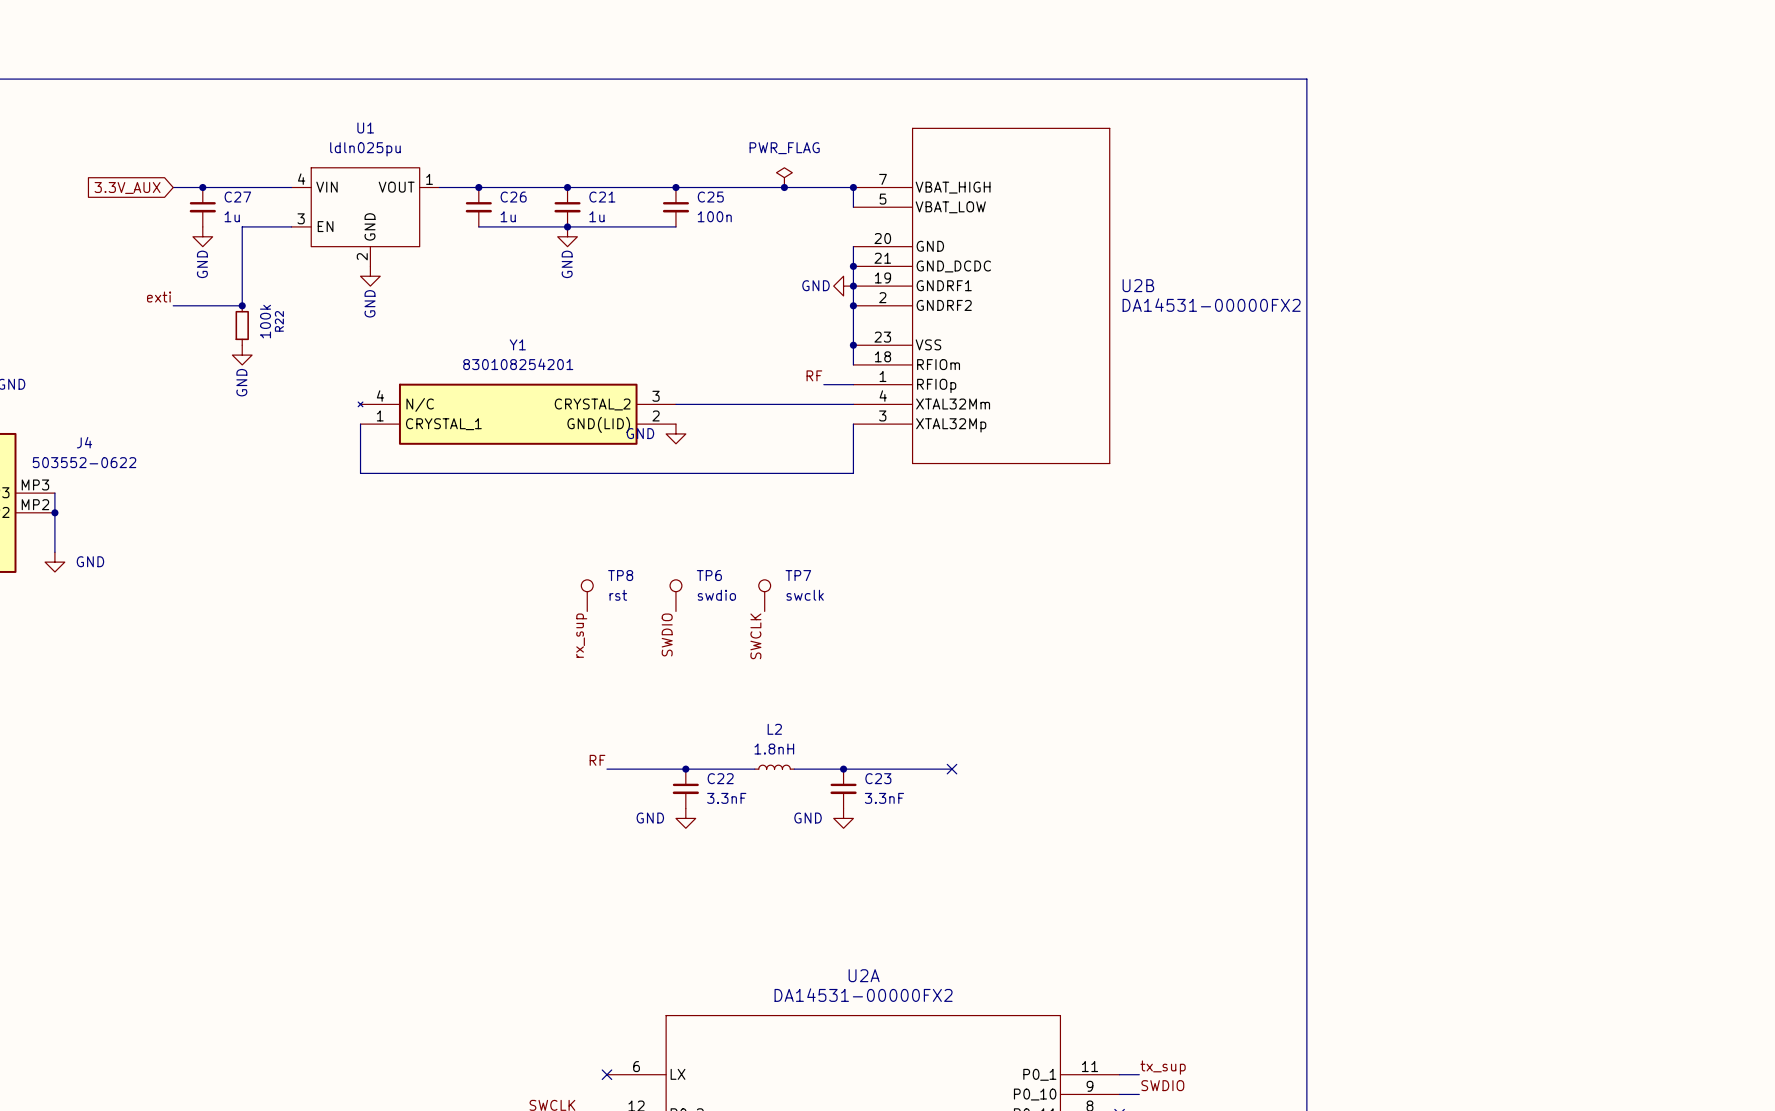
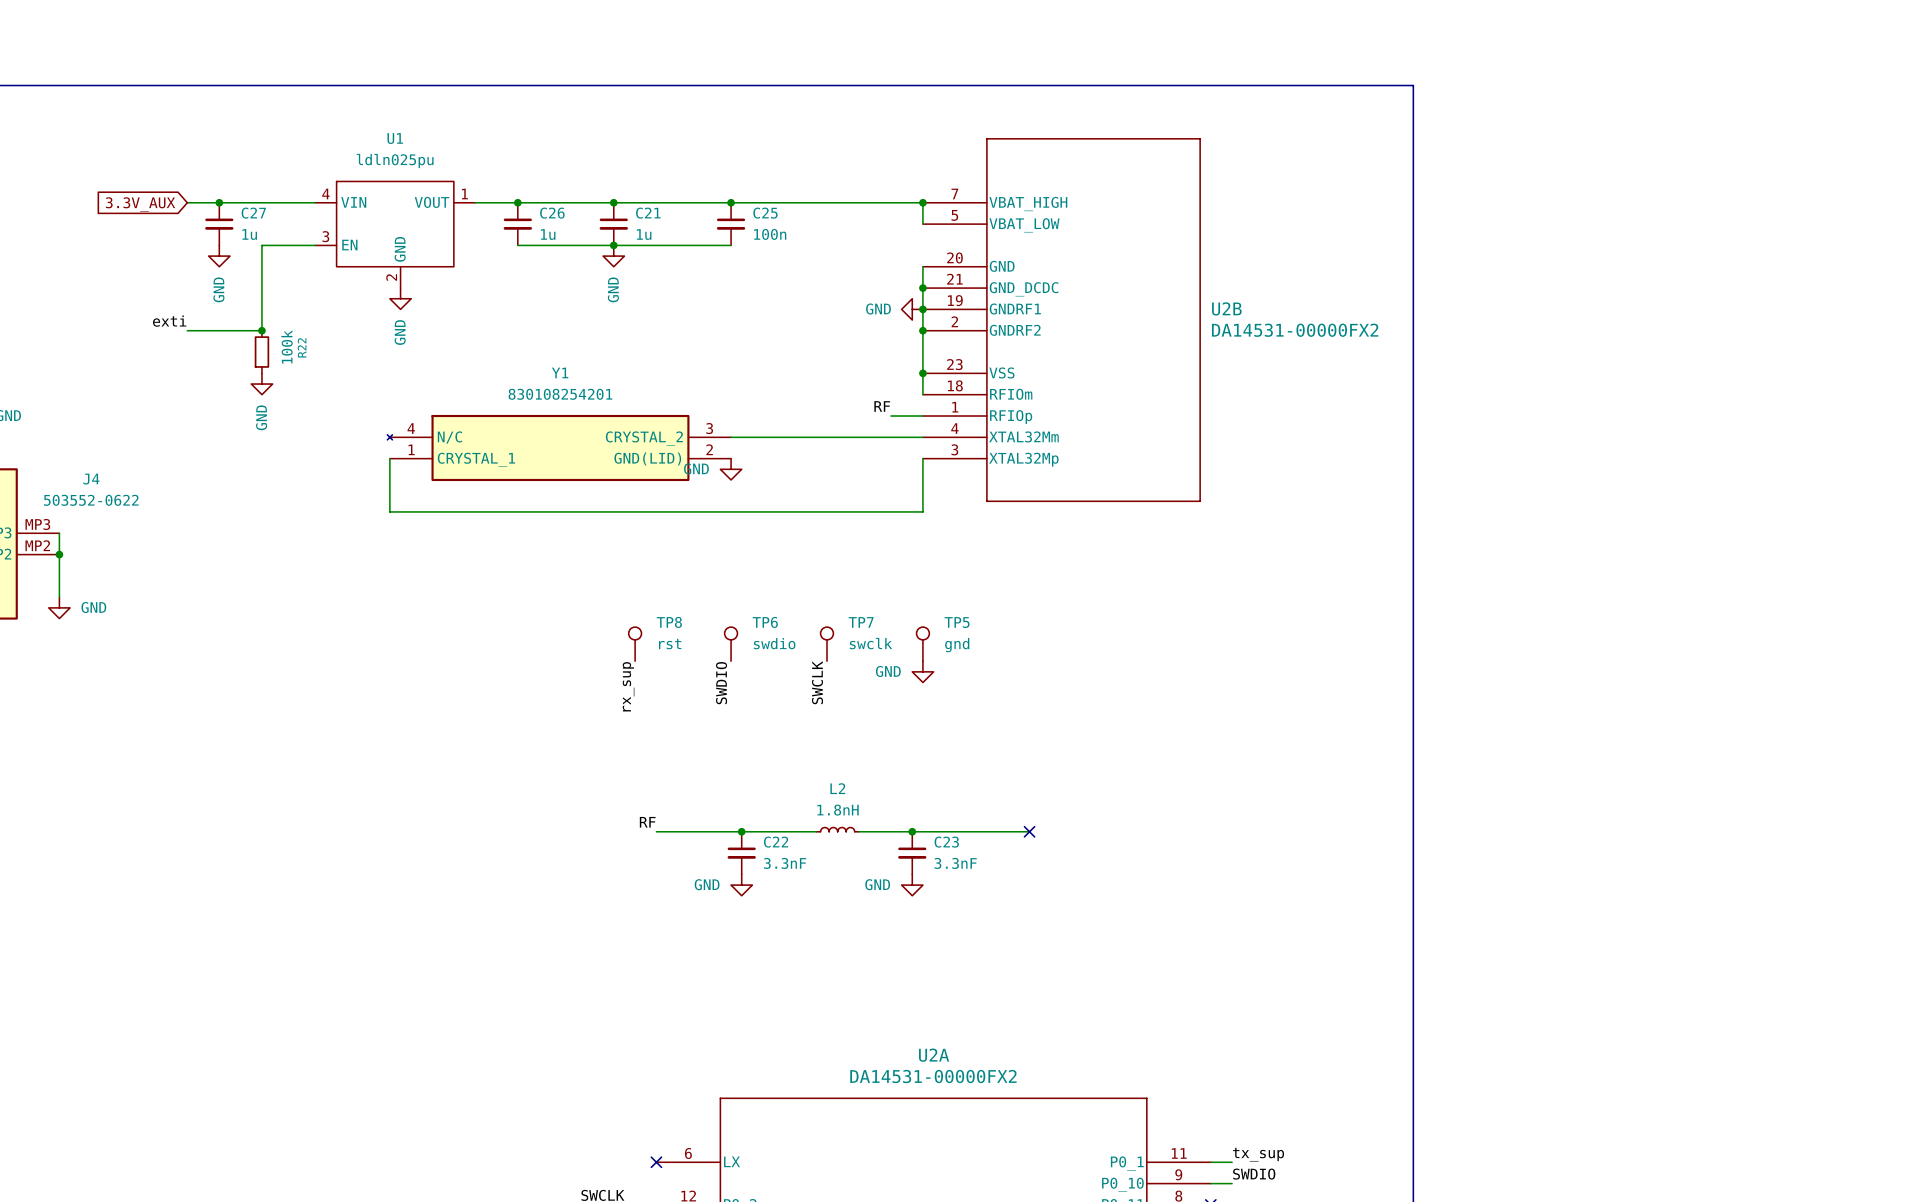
power symbol: PWR_FLAG (784, 177) -> none
junction: (784, 187) -> none
TP5: none -> gnd (922, 644)
power symbol: none -> GND (922, 671)

